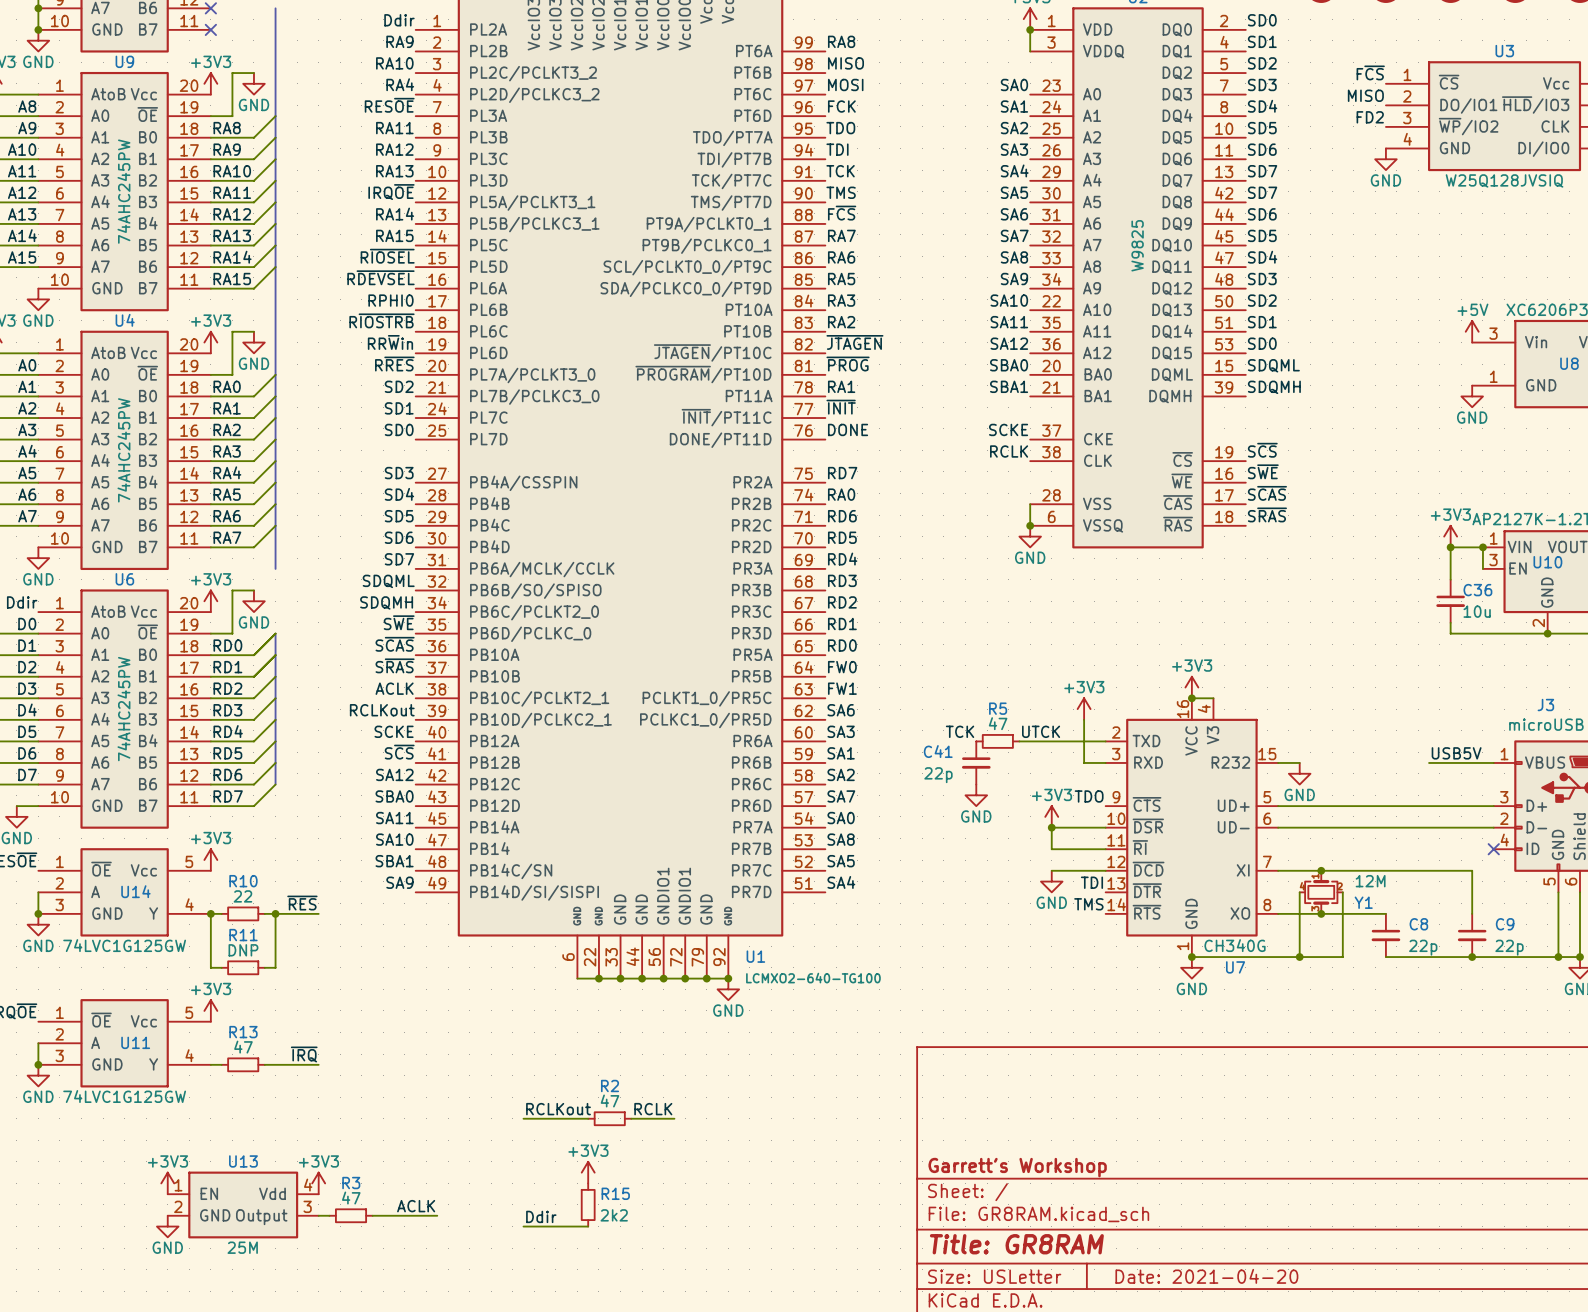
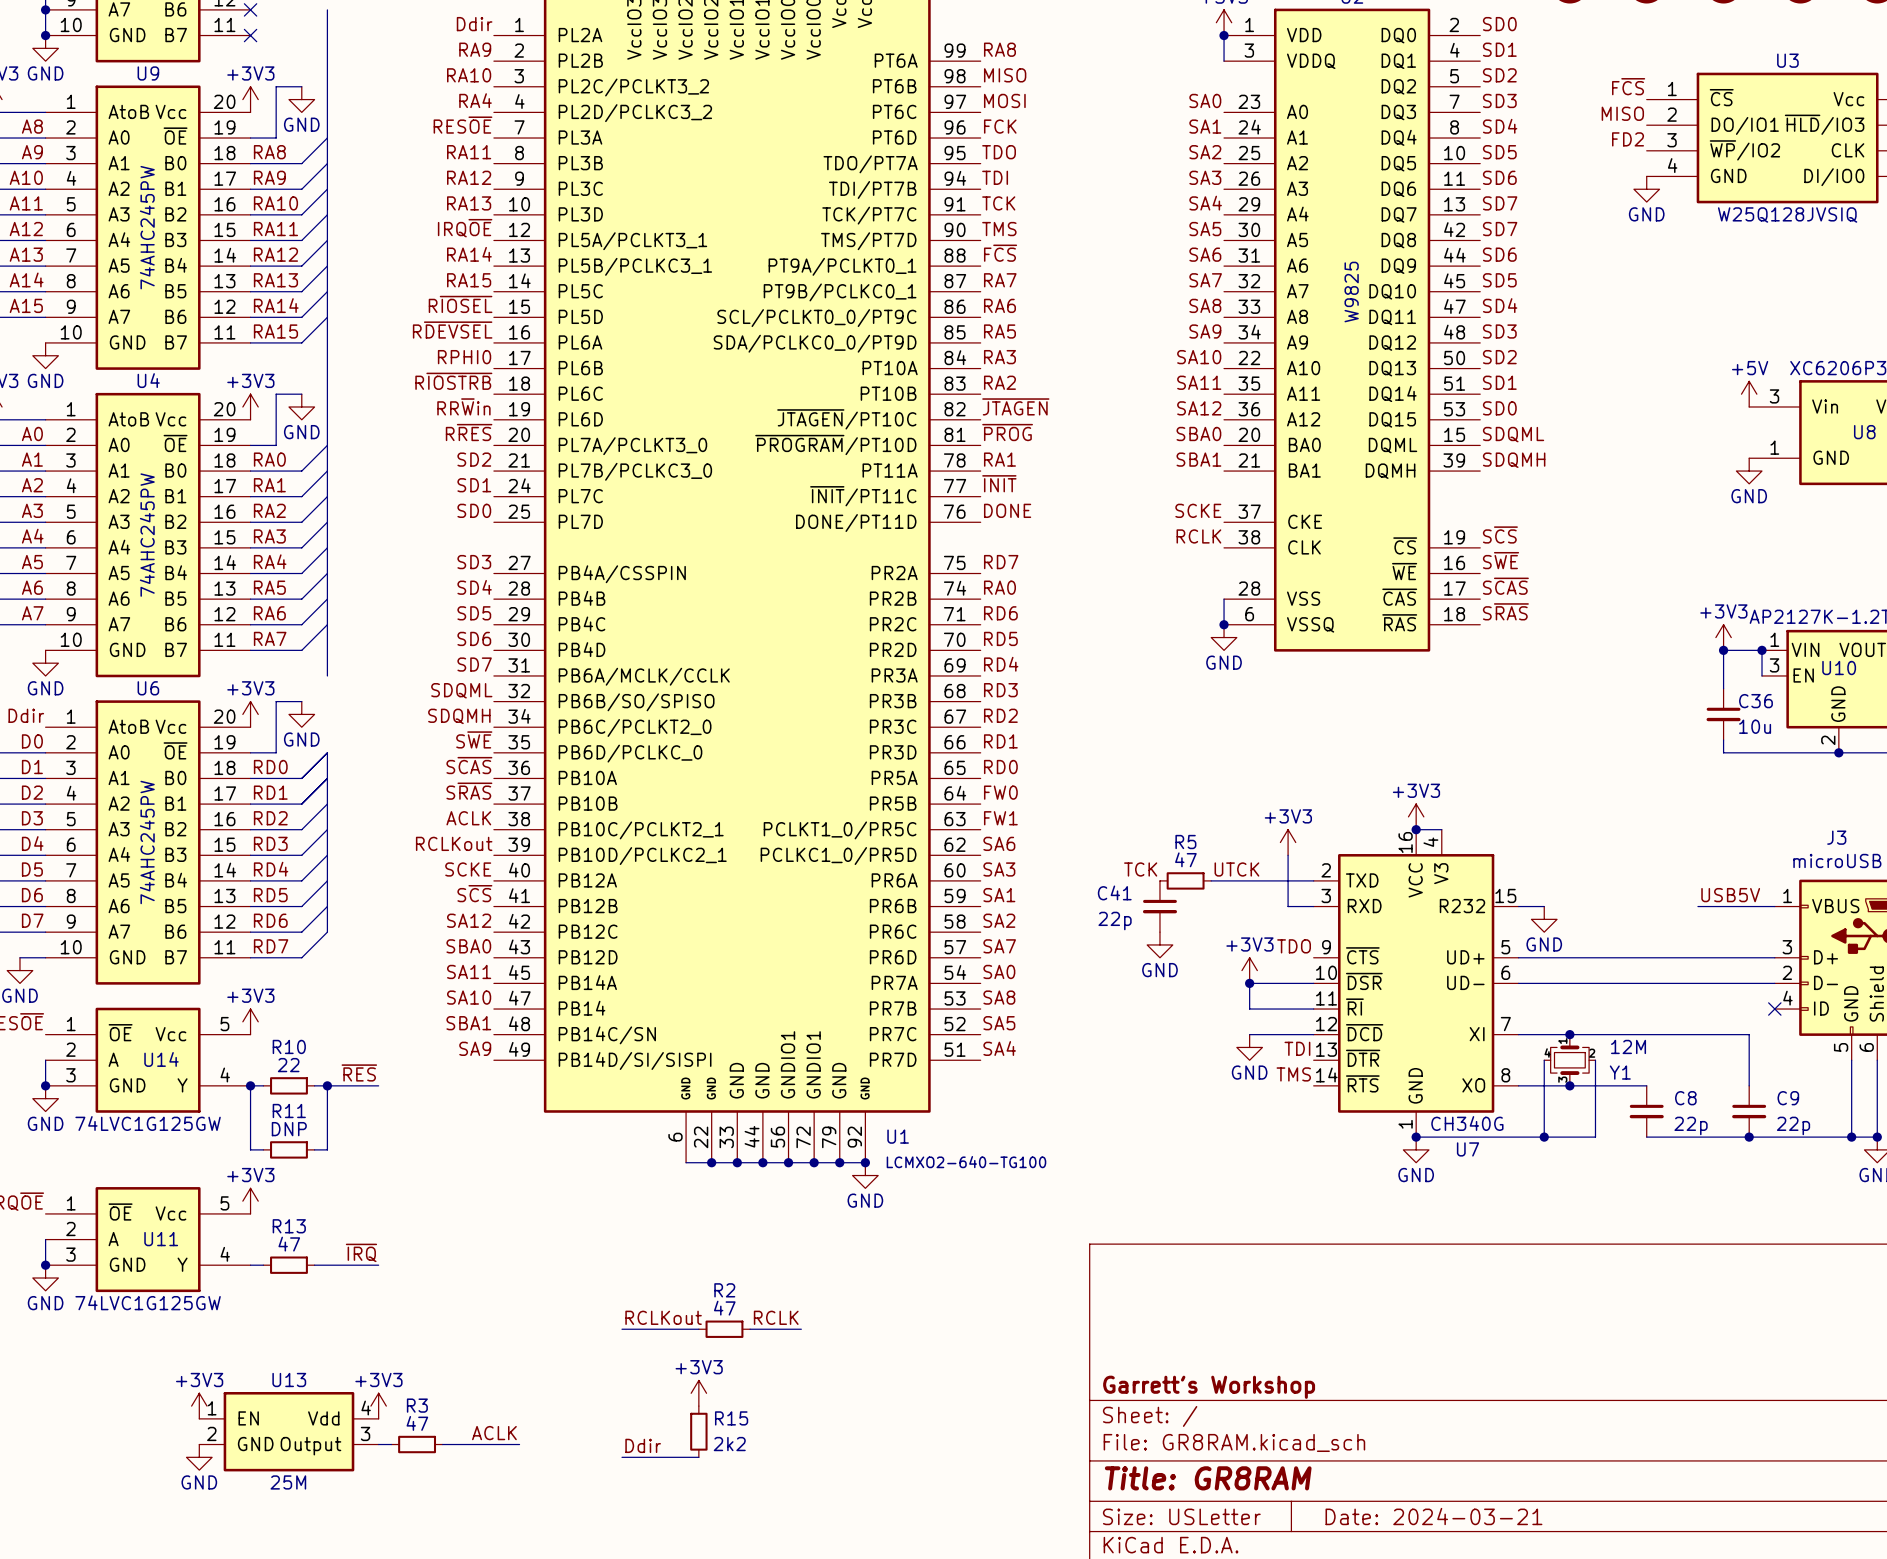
title block: Date: 2021-04-20 (1206, 1276) -> Date: 2024-03-21 (1433, 1516)

